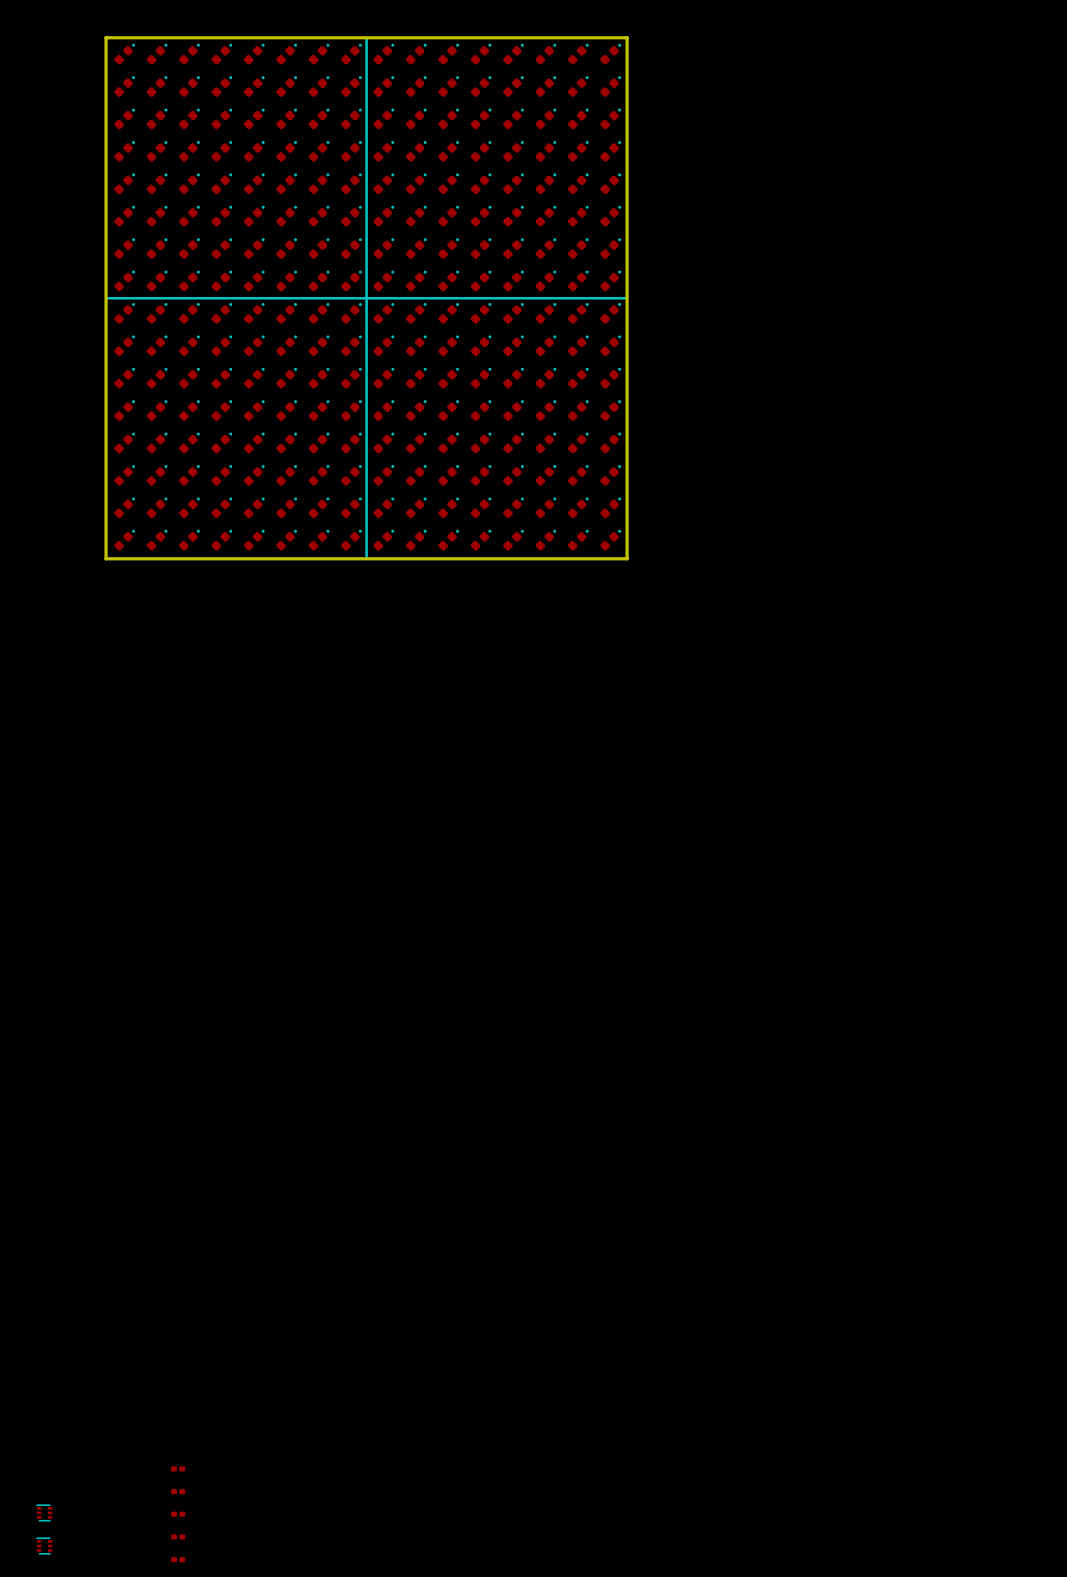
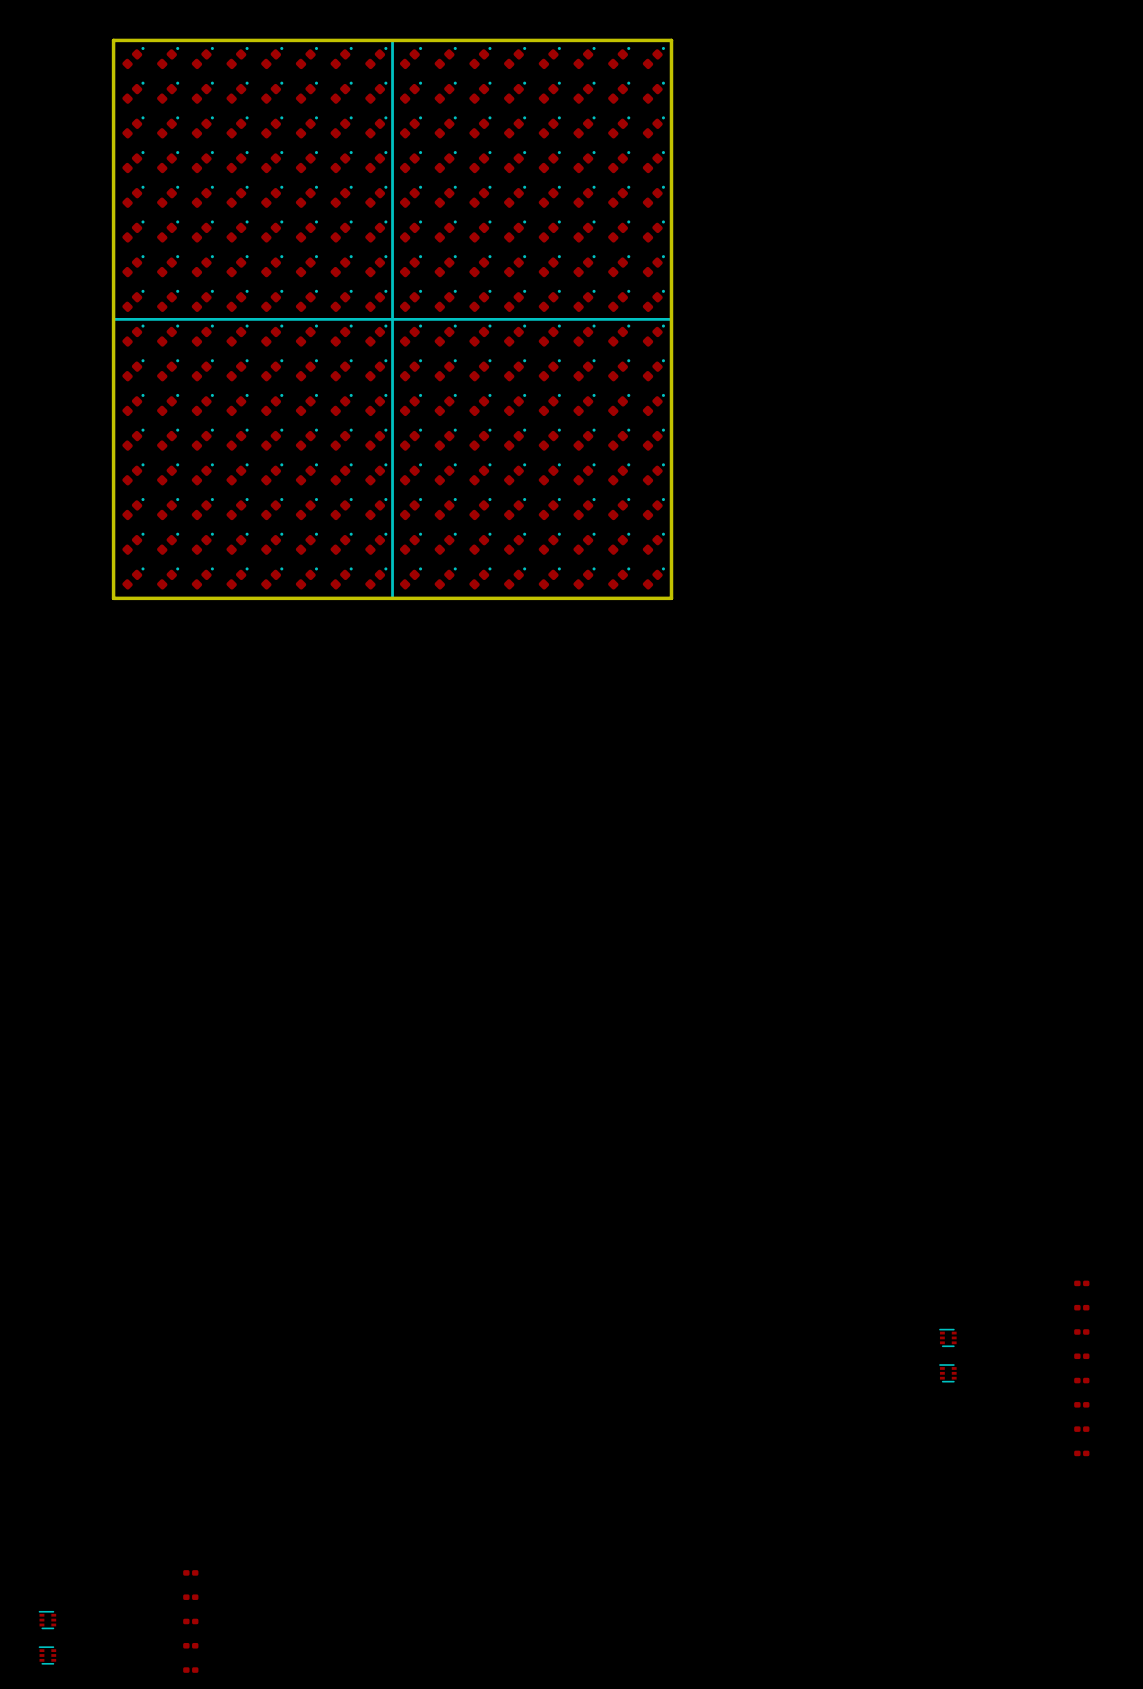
part: none -> (1081, 1283)
part: none -> (1081, 1307)
part: none -> (1081, 1331)
part: none -> (947, 1337)
part: none -> (1081, 1356)
part: none -> (947, 1373)
part: none -> (1081, 1380)
part: none -> (1081, 1404)
part: none -> (1081, 1429)
part: none -> (1081, 1453)

